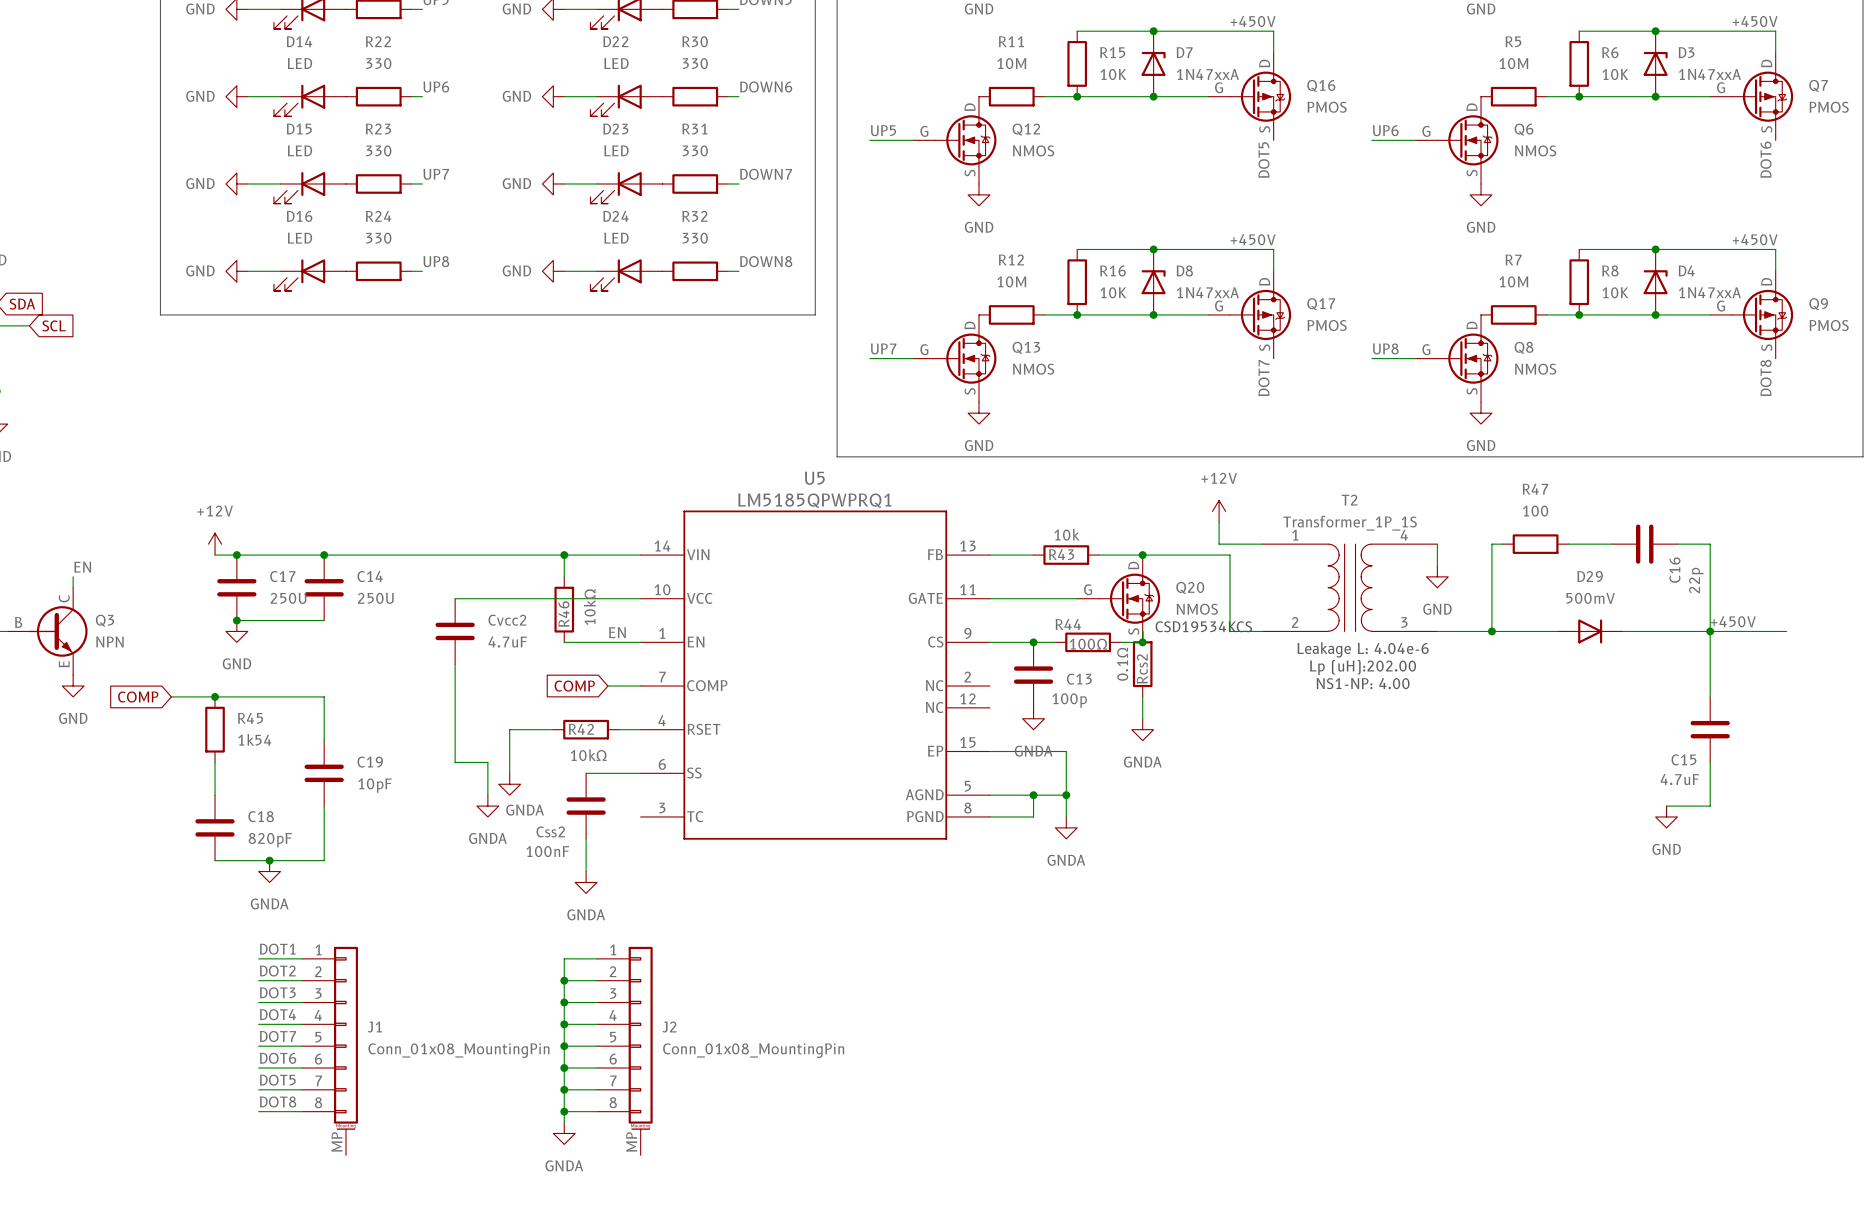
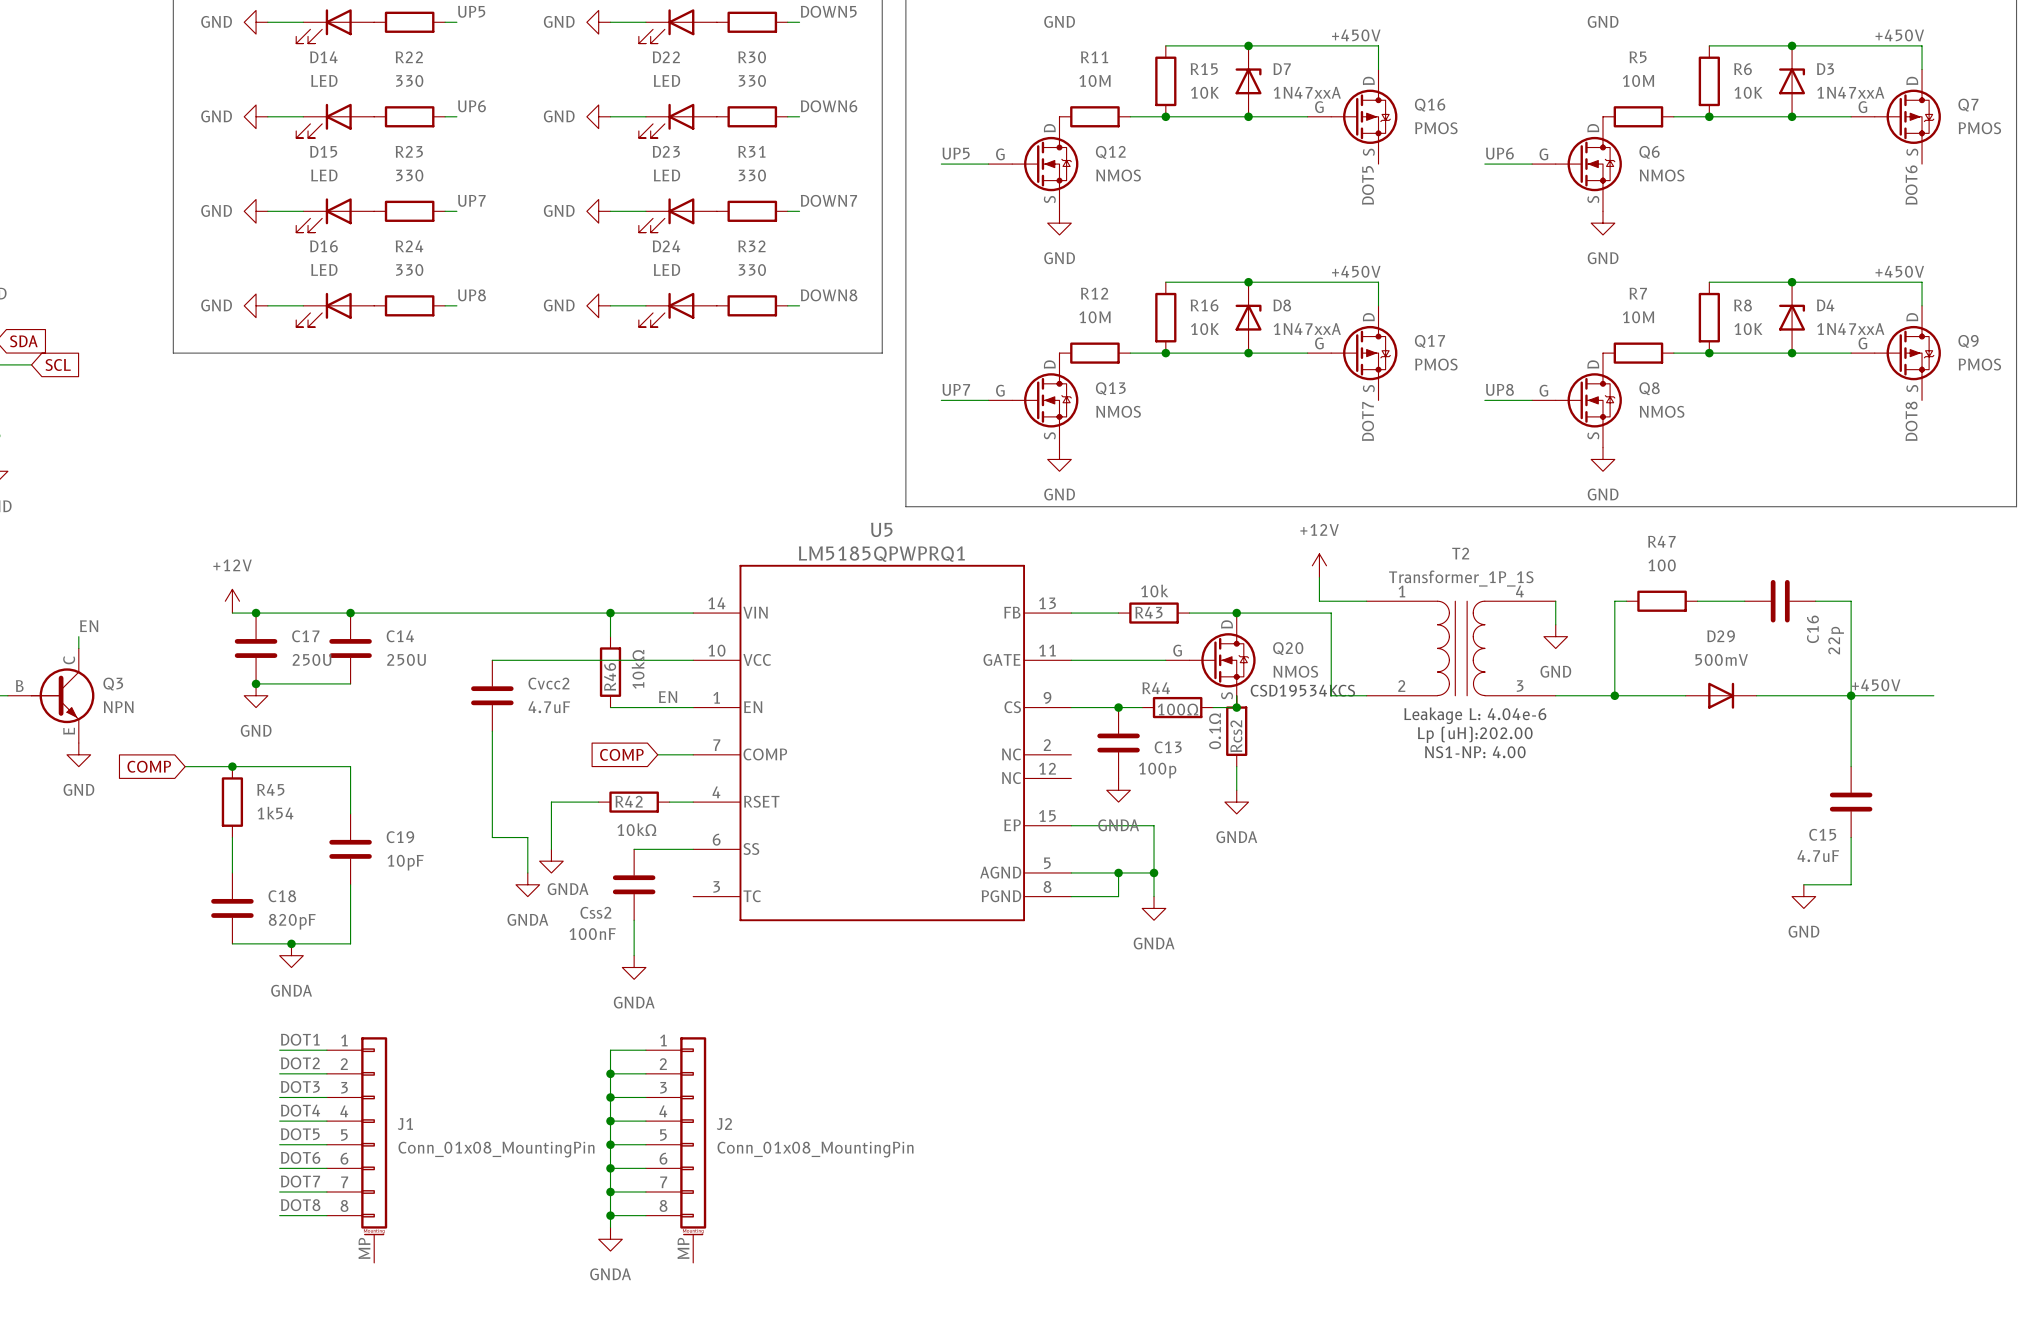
label: DOT7 (277, 1036) -> DOT5 (300, 1134)
label: DOT5 (277, 1080) -> DOT7 (300, 1181)

